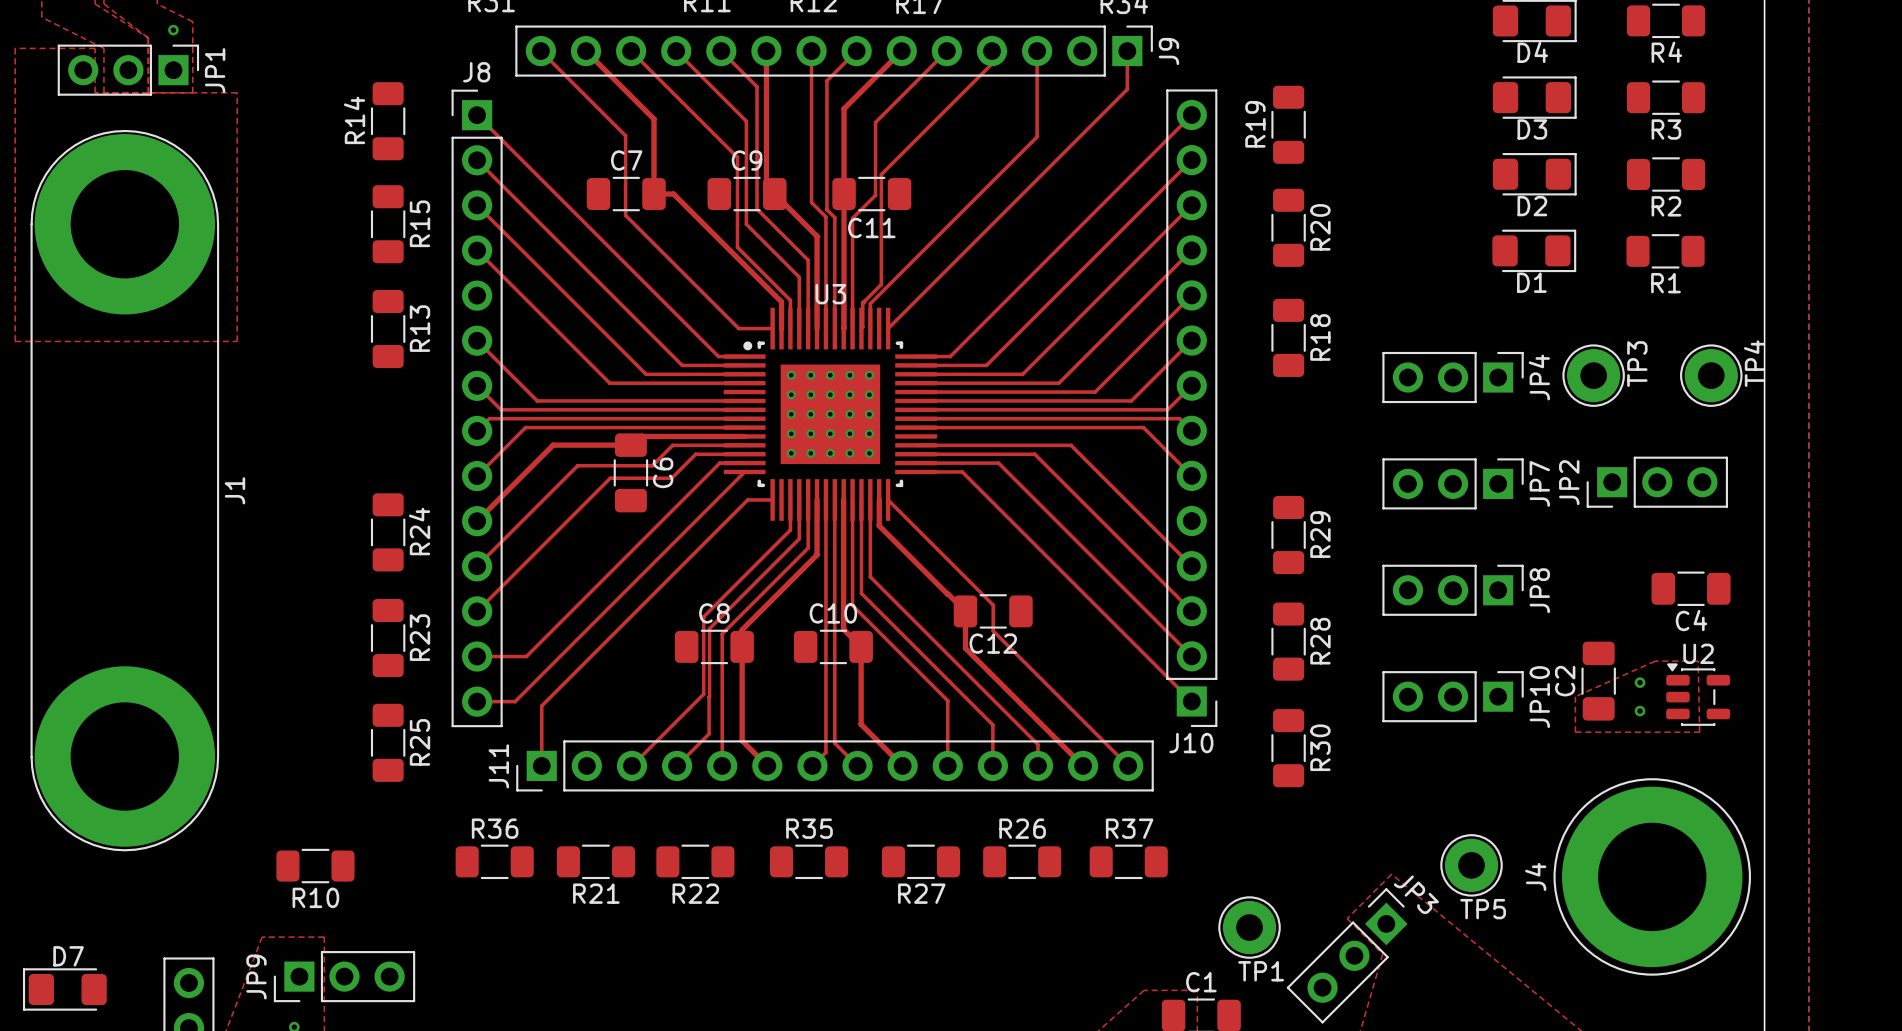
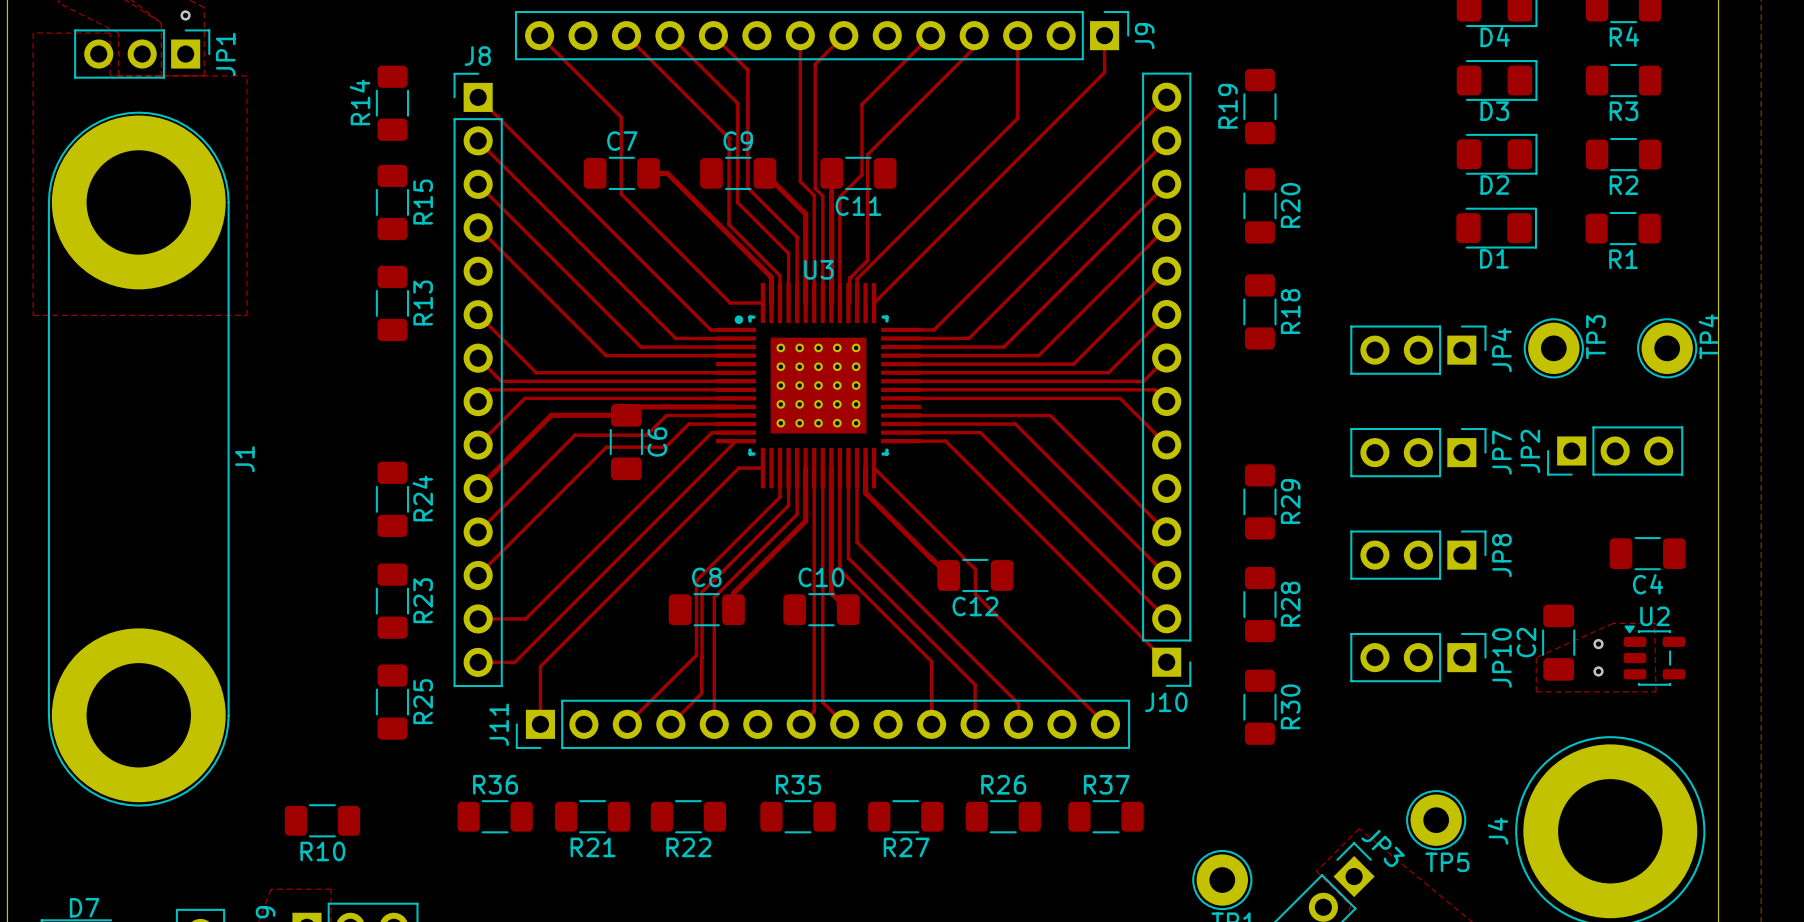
top track: (585, 51) (654, 119) (654, 194) -> none
top track: (766, 51) (766, 185) (774, 194) -> none
top track: (901, 51) (844, 108) (844, 194) -> none
top track: (965, 611) (965, 648) (1083, 765) -> none
top track: (742, 646) (742, 740) (767, 765) -> none
top track: (861, 646) (861, 724) (902, 765) -> none

